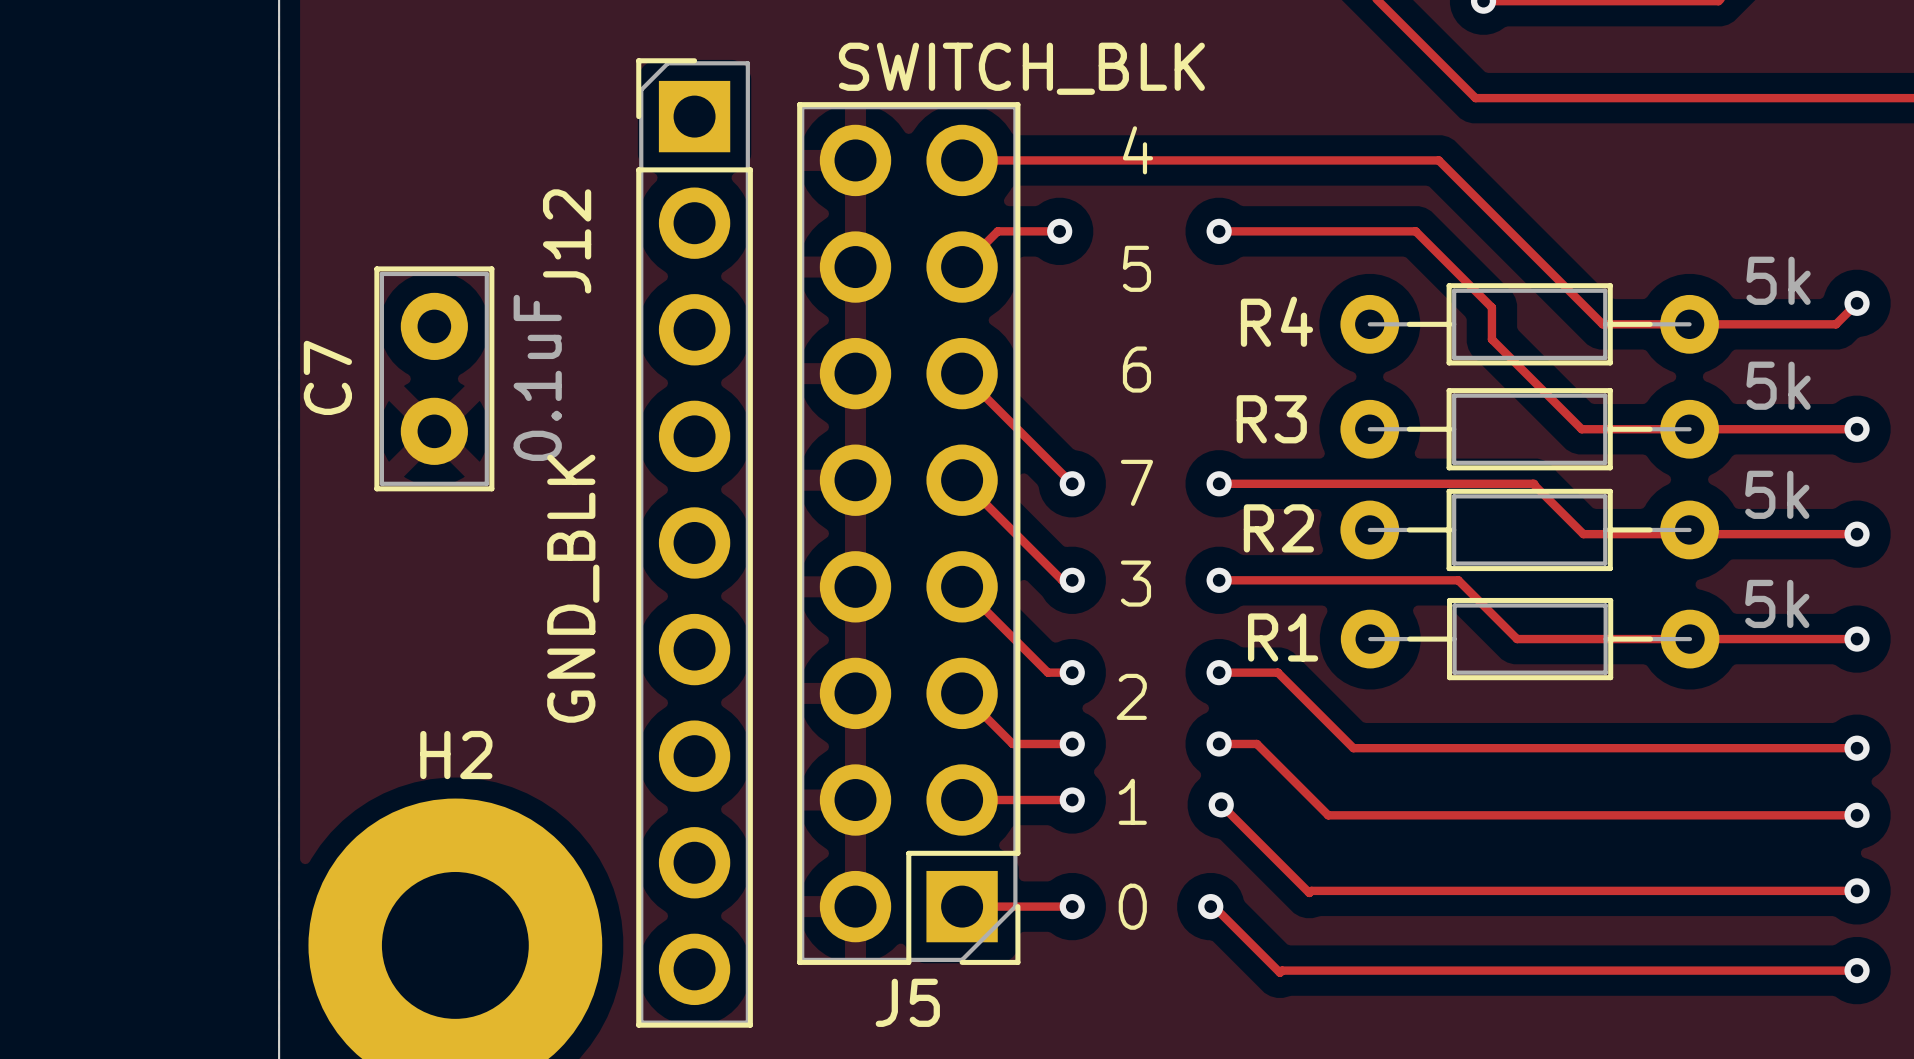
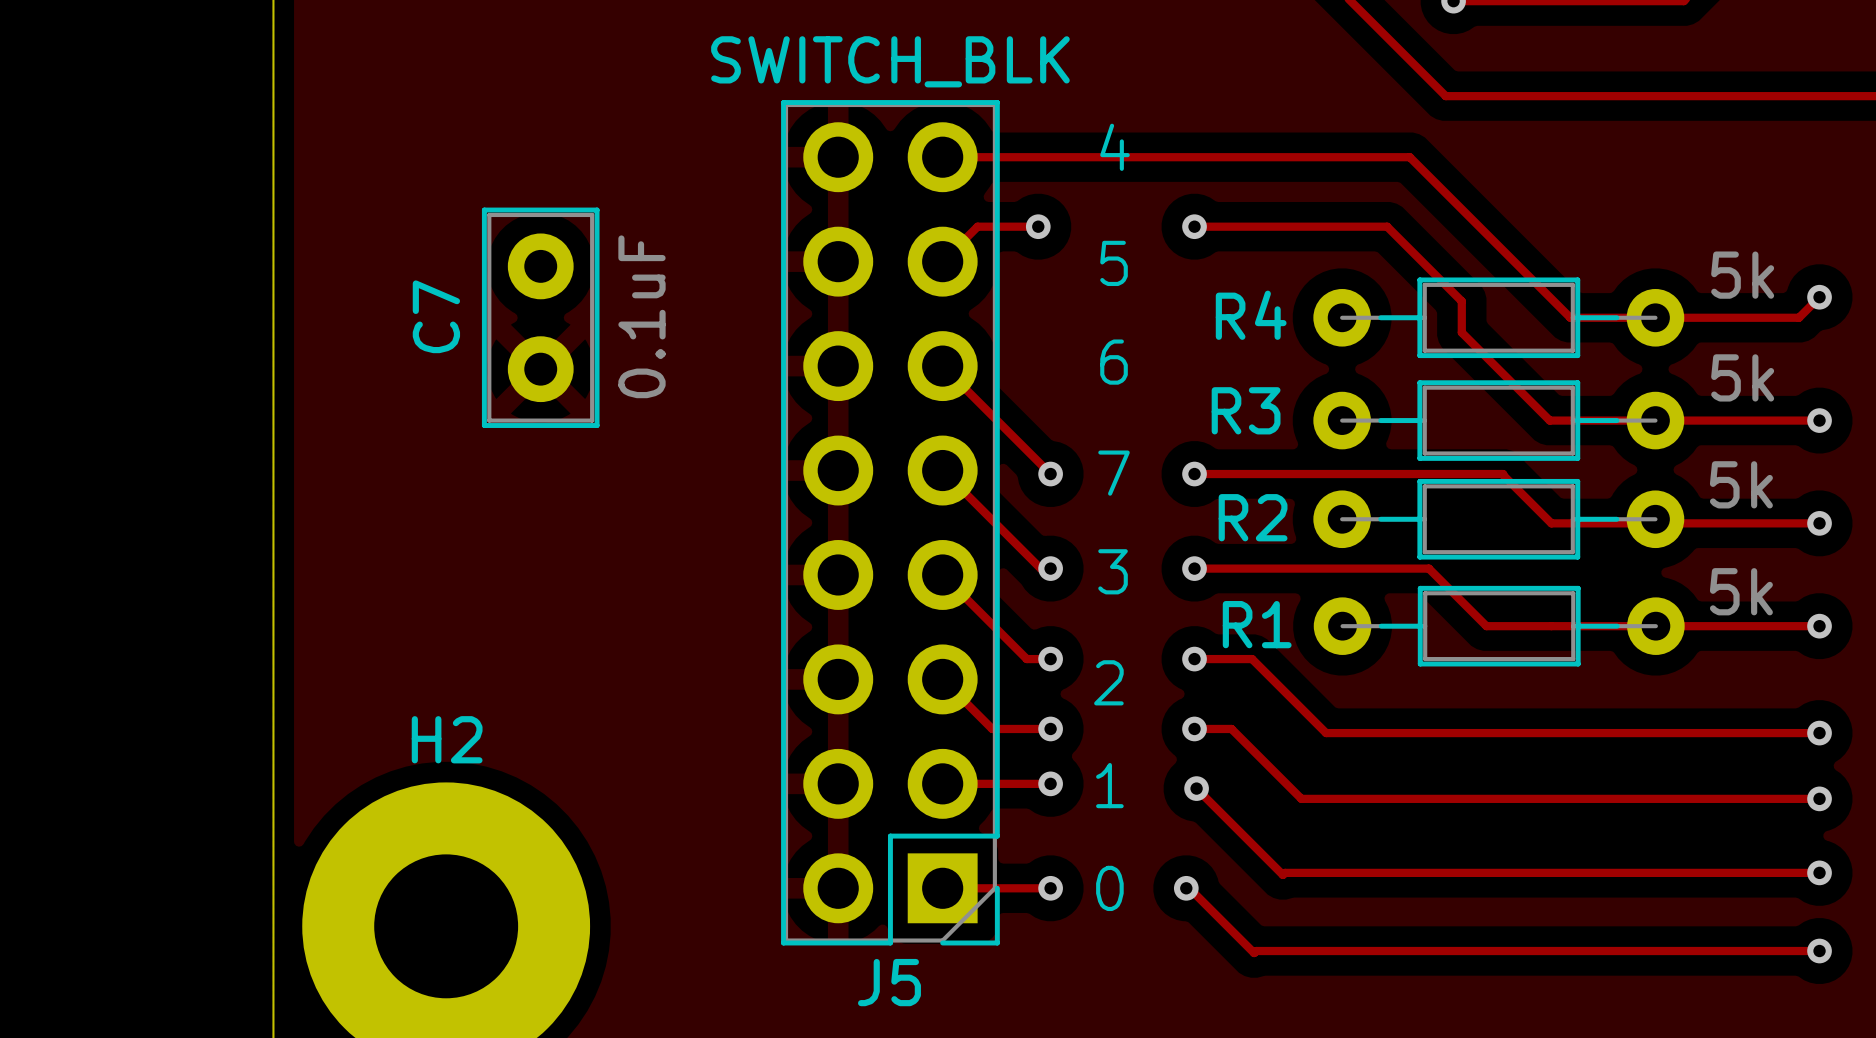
J5 value position: SWITCH_BLK (1021, 68) -> SWITCH_BLK (890, 61)
C7 position: (434, 378) -> (540, 317)
J12: GND_BLK (694, 542) -> none

